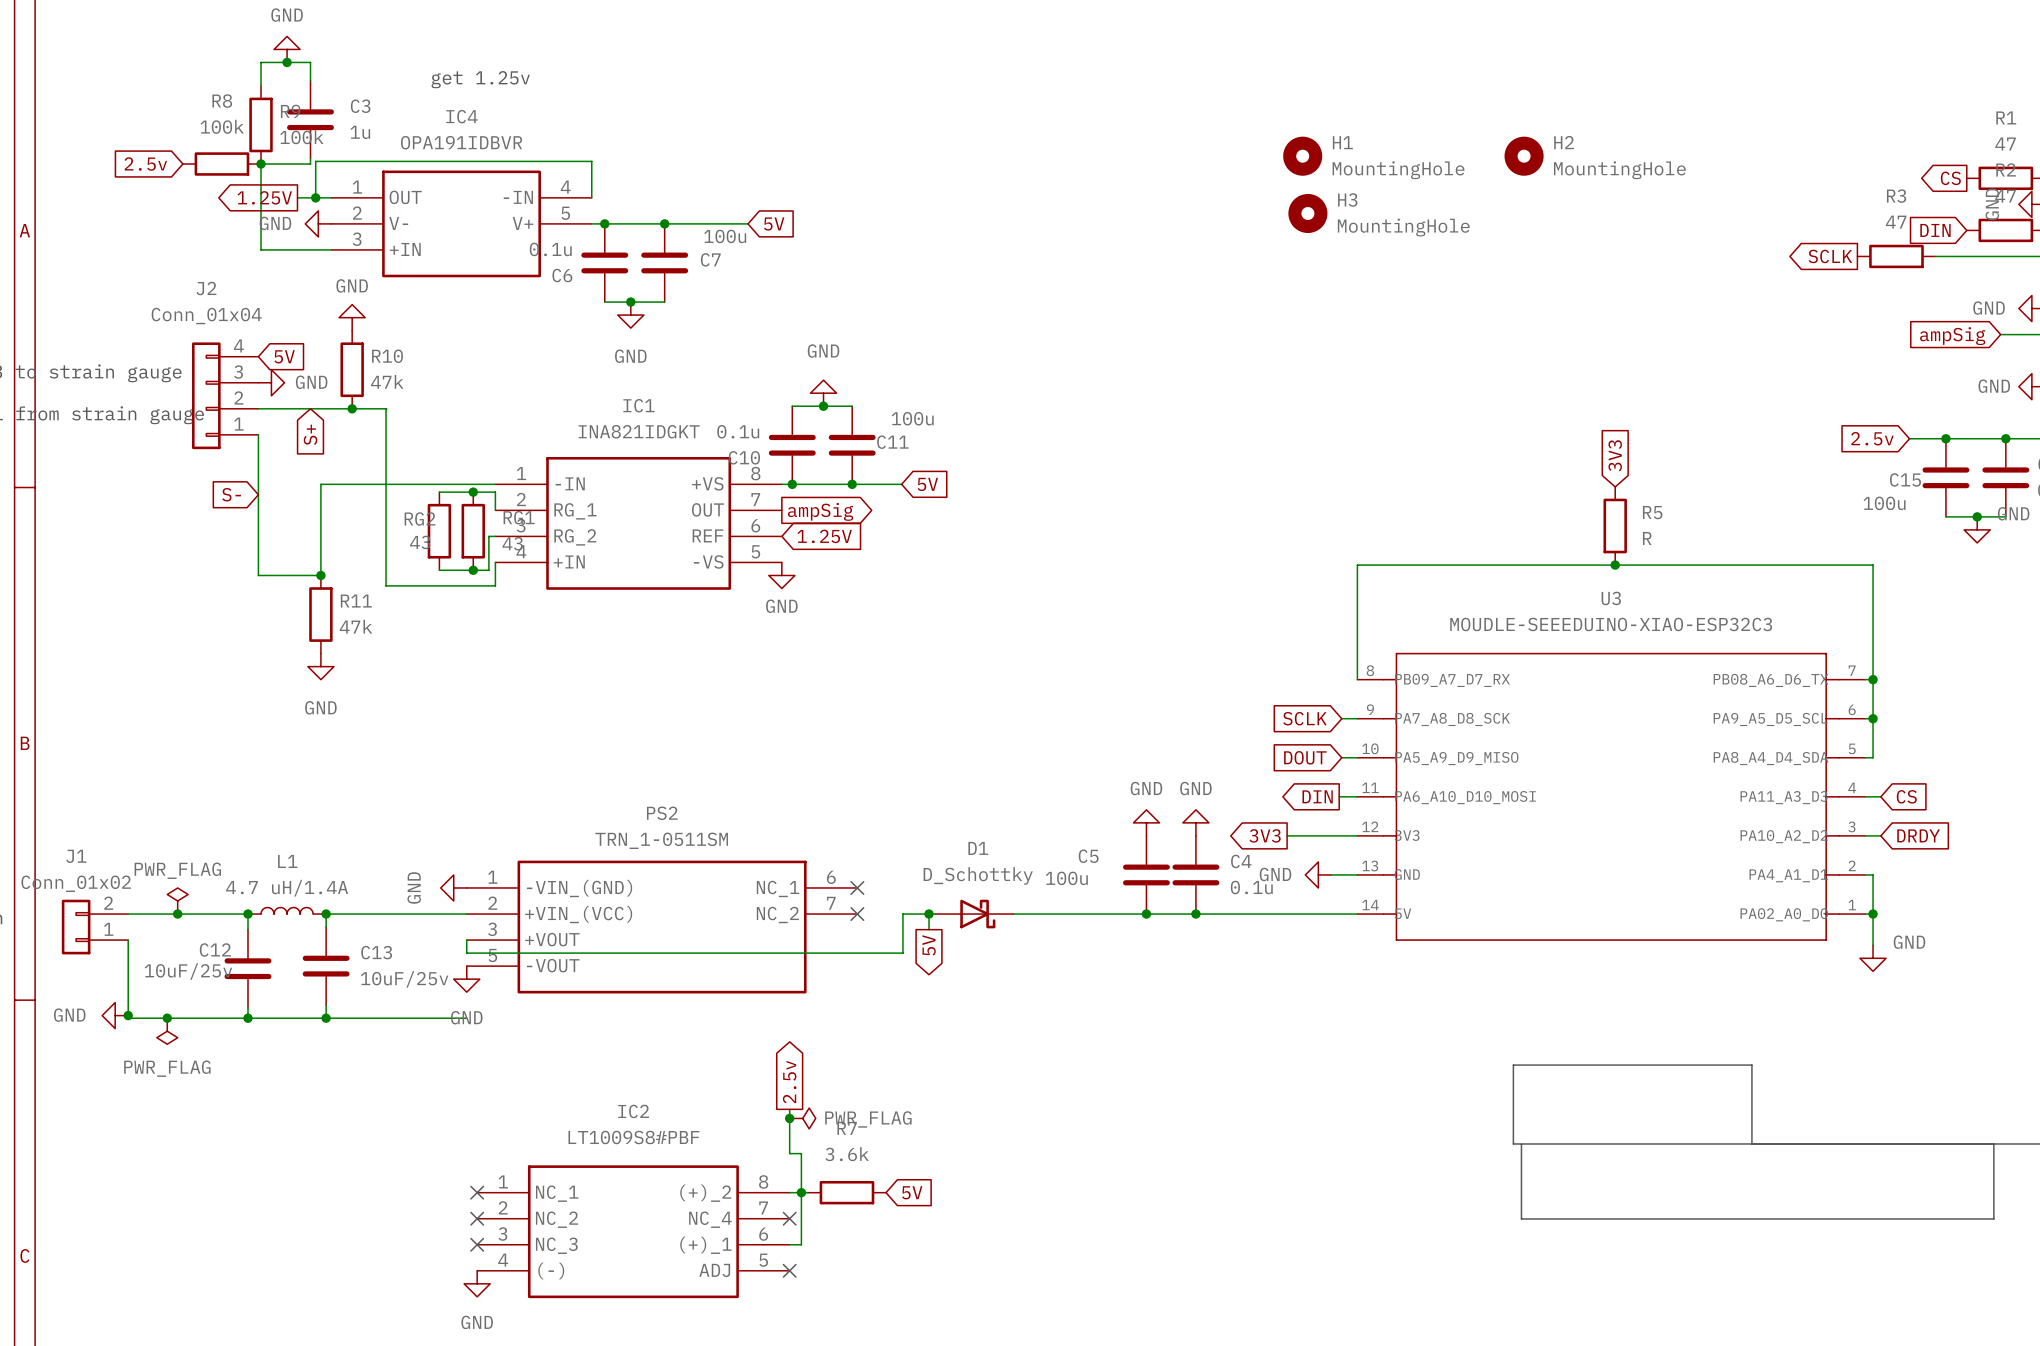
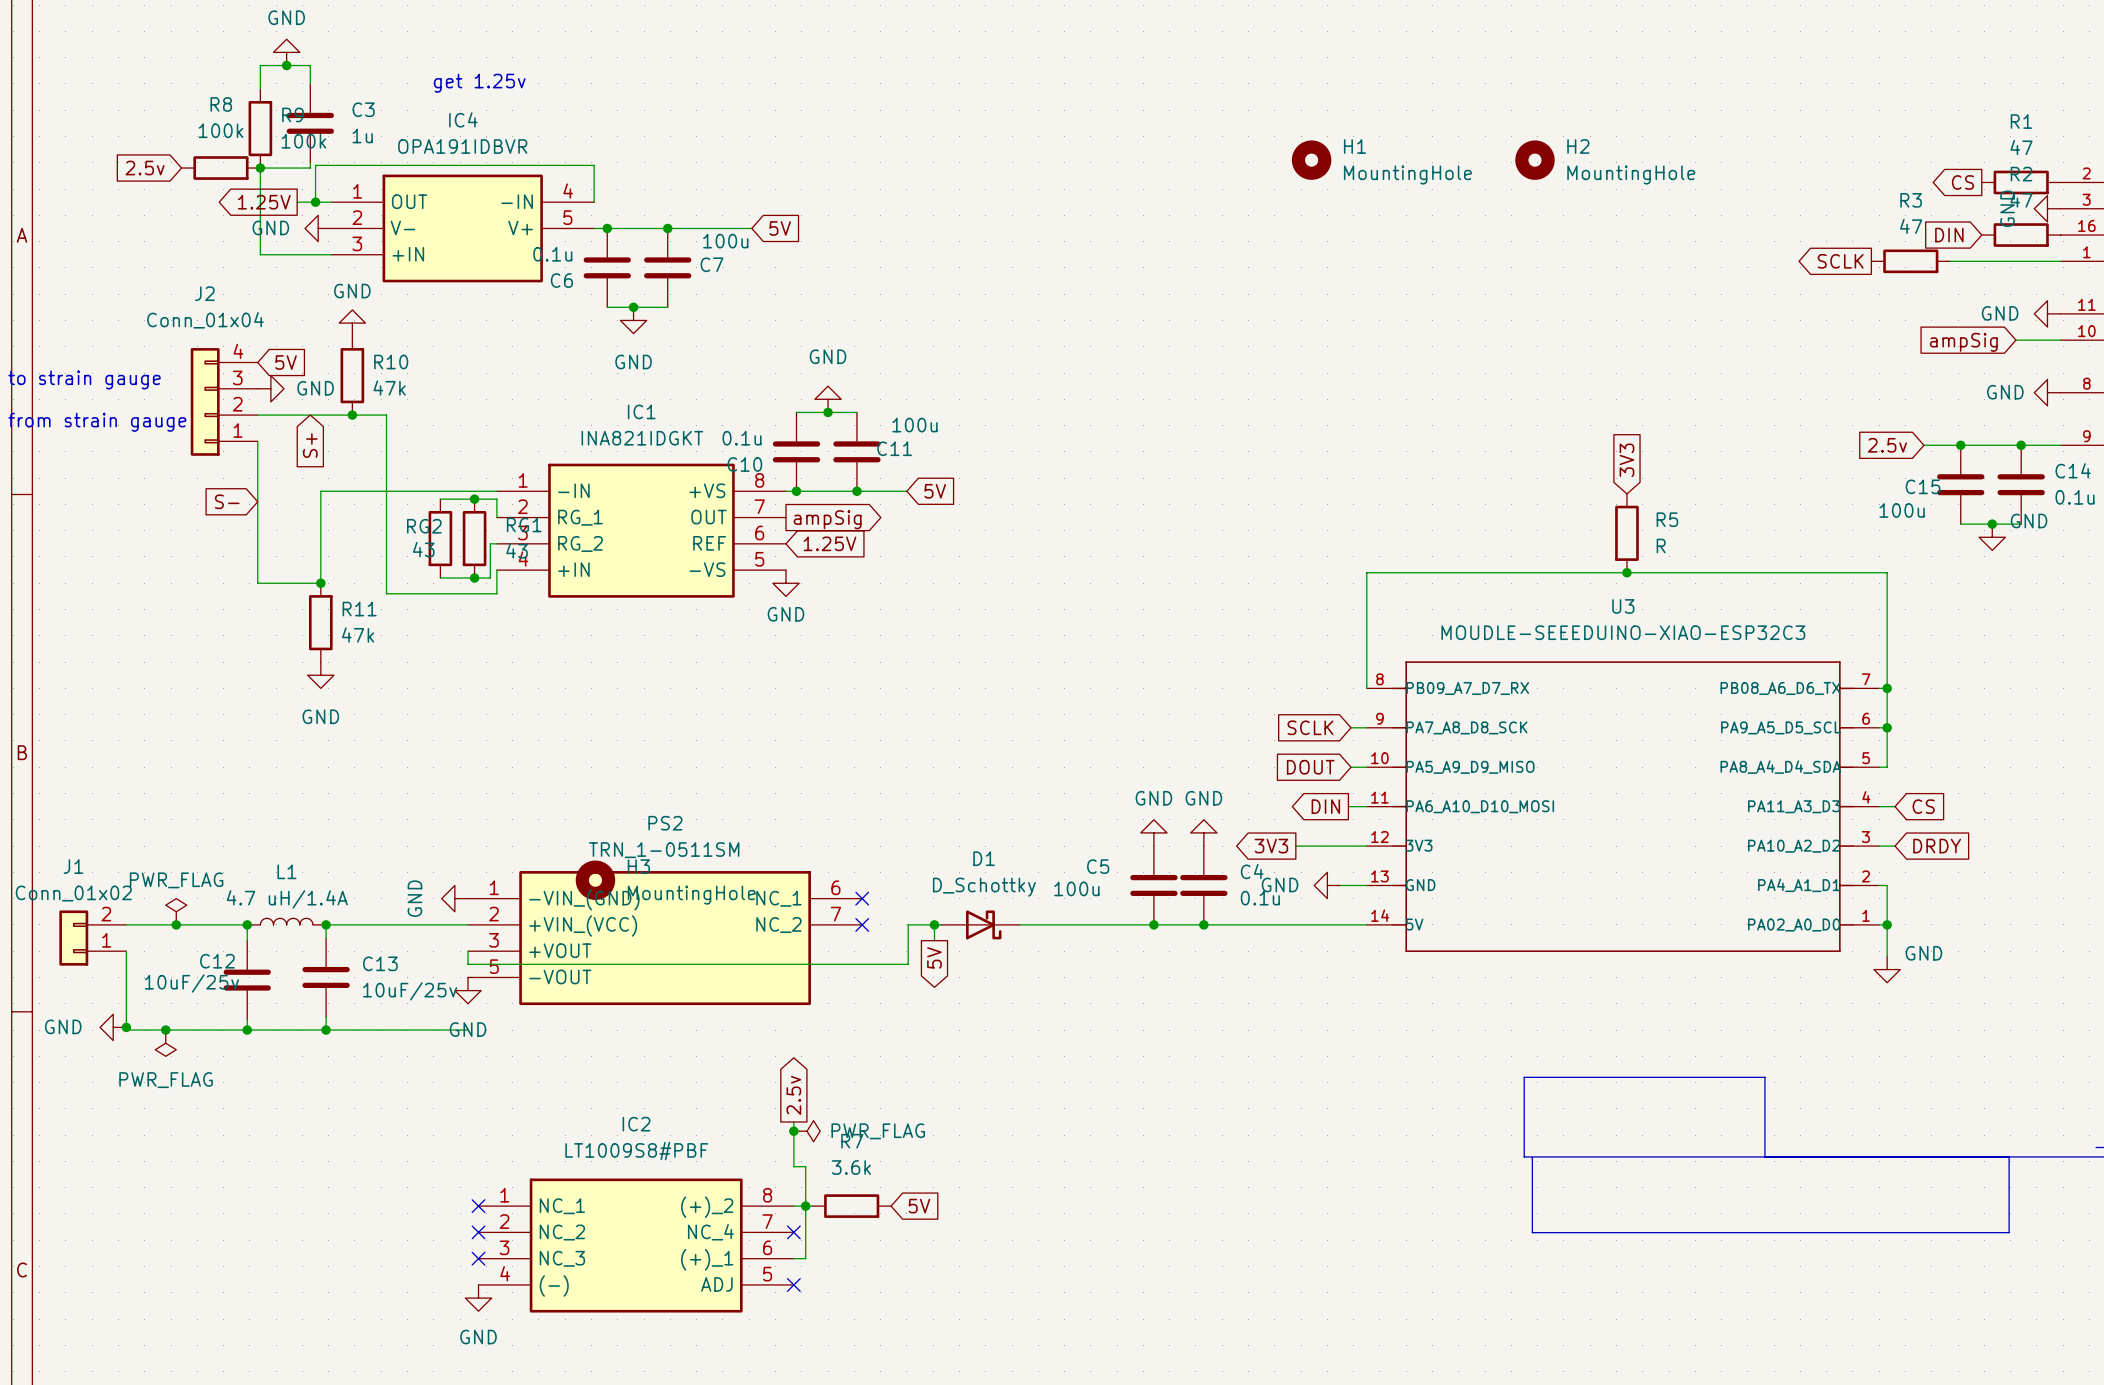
H3 position: (1307, 213) -> (595, 880)

